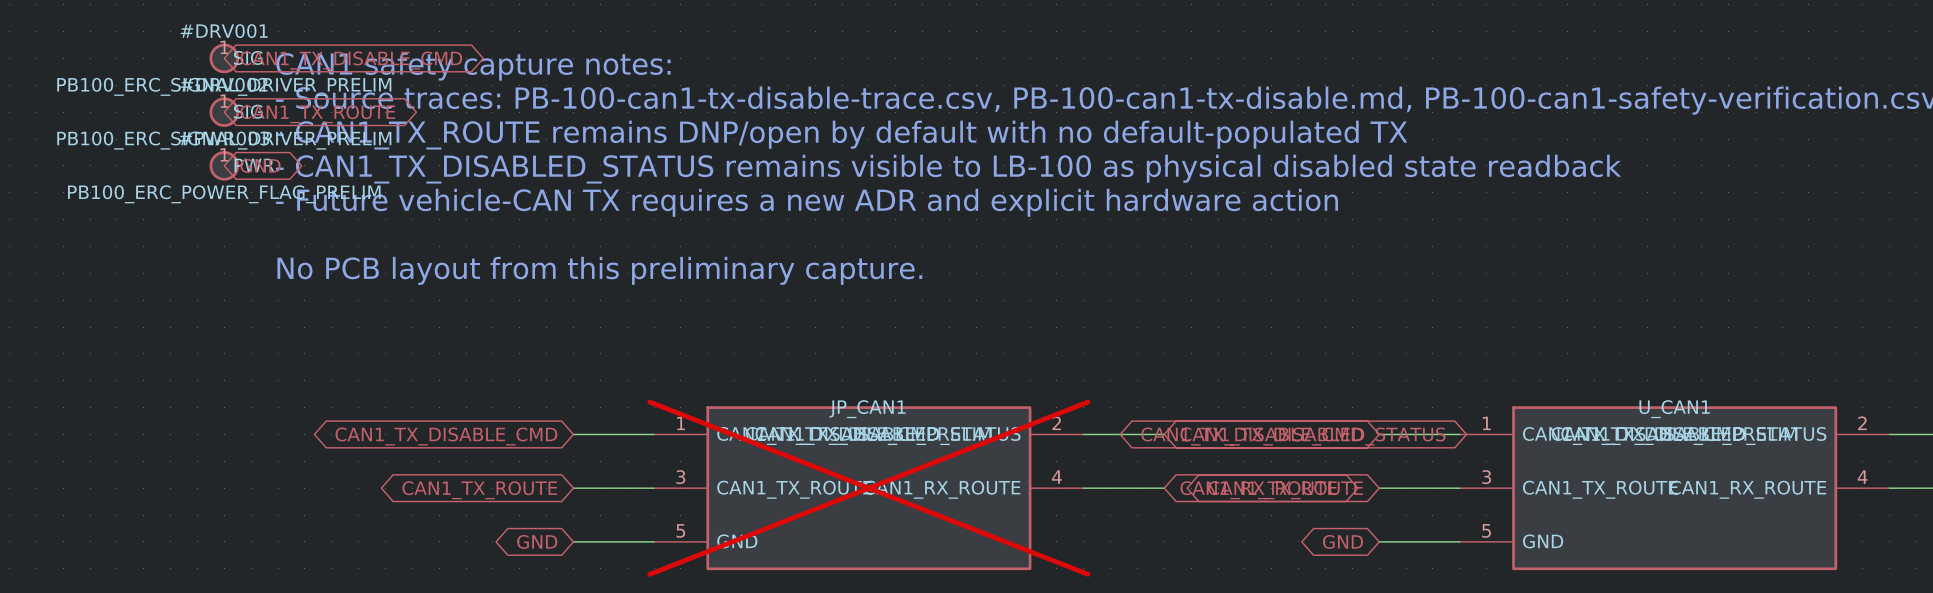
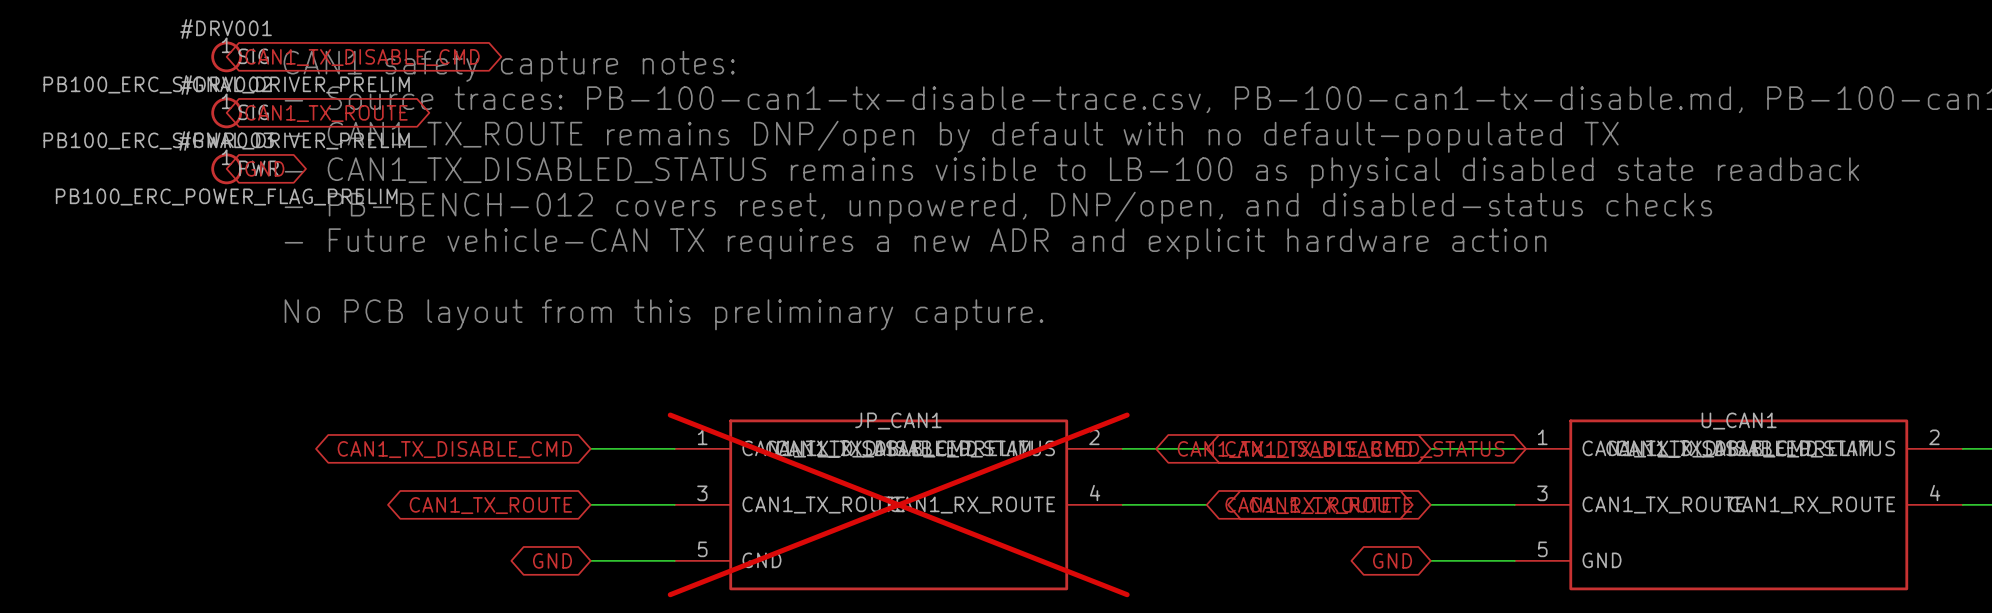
text: - Future vehicle-CAN TX requires a new ADR and explicit hardware action (807, 202) -> - PB-BENCH-012 covers reset, unpowered, DNP/open, and disabled-status checks (998, 207)
text: none -> - Future vehicle-CAN TX requires a new ADR and explicit hardware action (915, 243)
text position: No PCB layout from this preliminary capture. (599, 270) -> No PCB layout from this preliminary capture. (664, 314)

